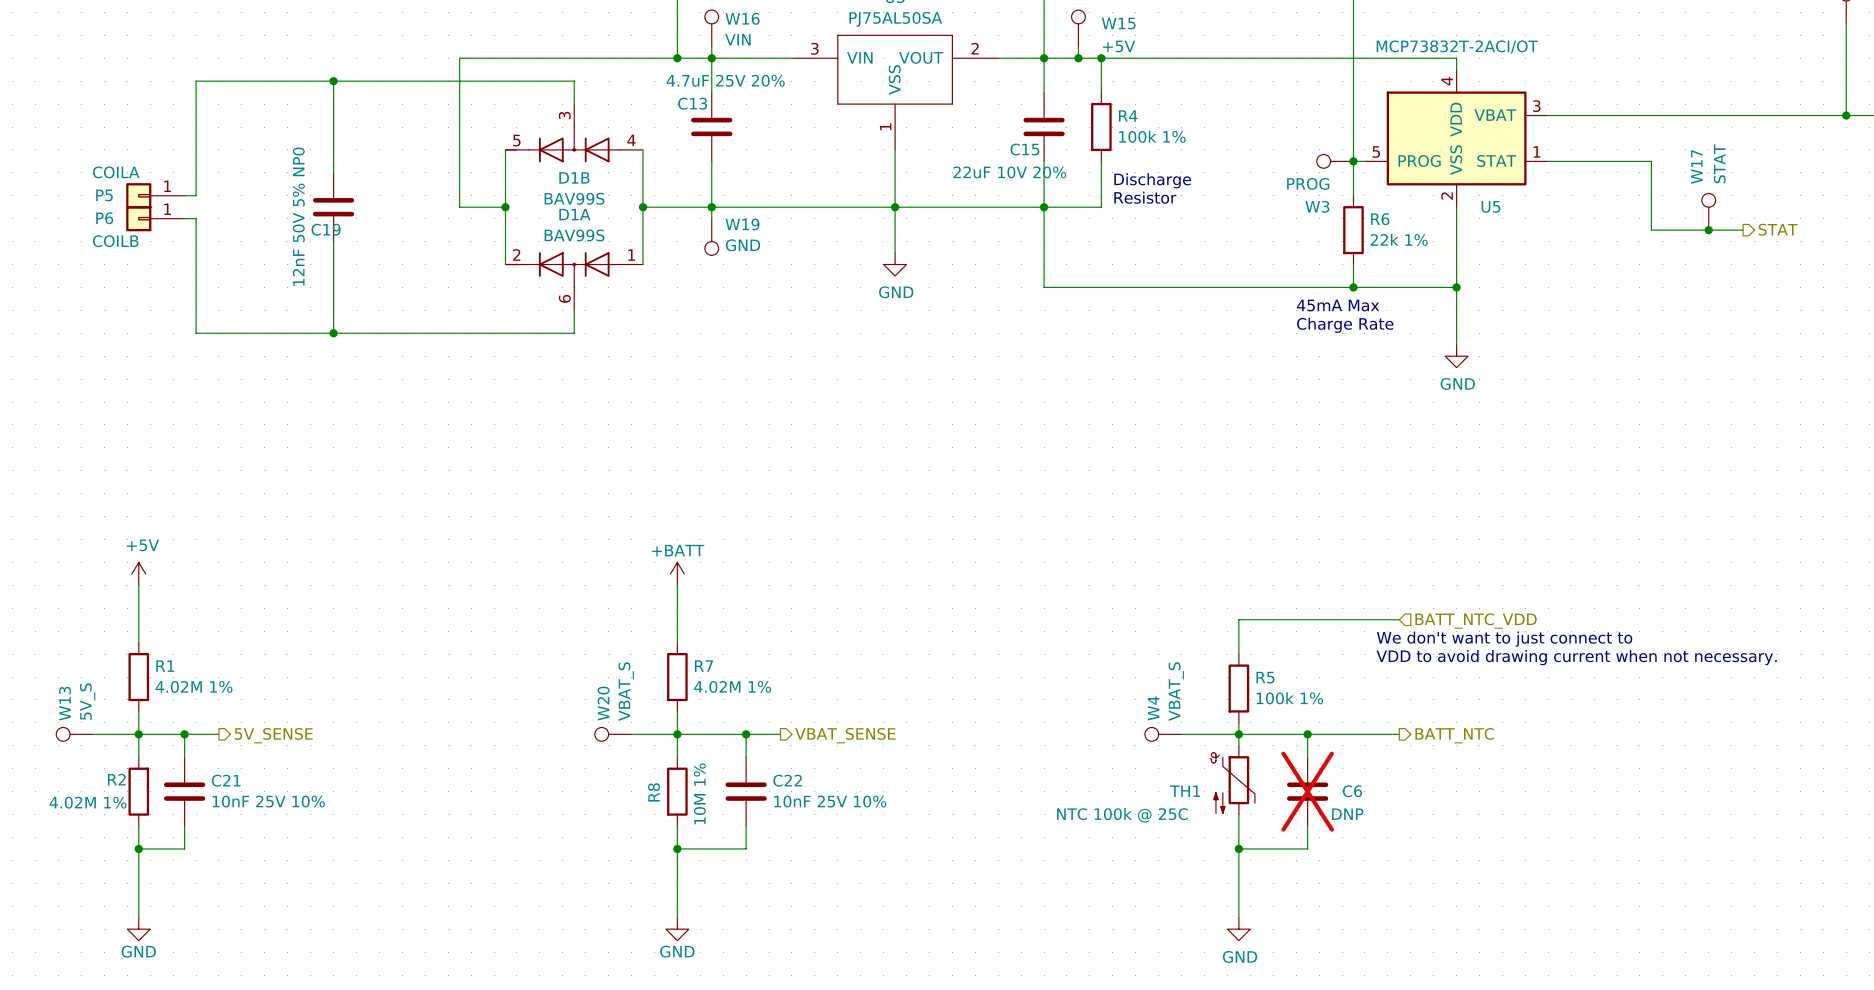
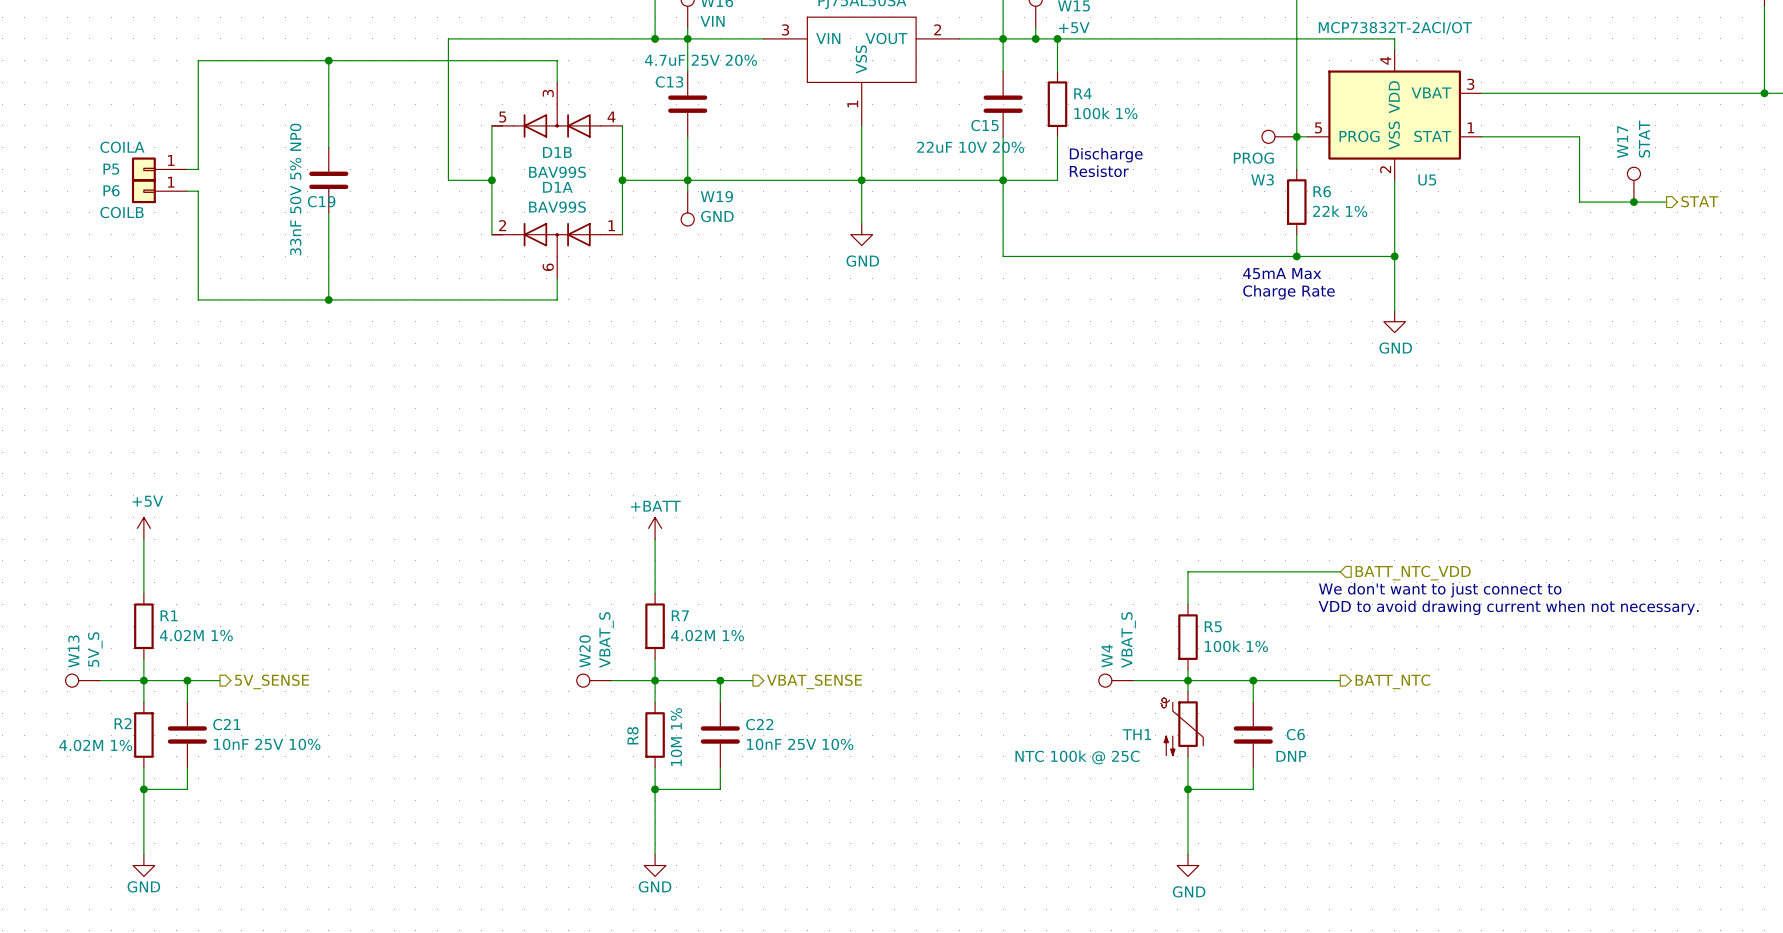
C19 value: 12nF 50V 5% NP0 (298, 216) -> 33nF 50V 5% NP0 (295, 189)
C6 do-not-place cross: (1307, 791) -> none

